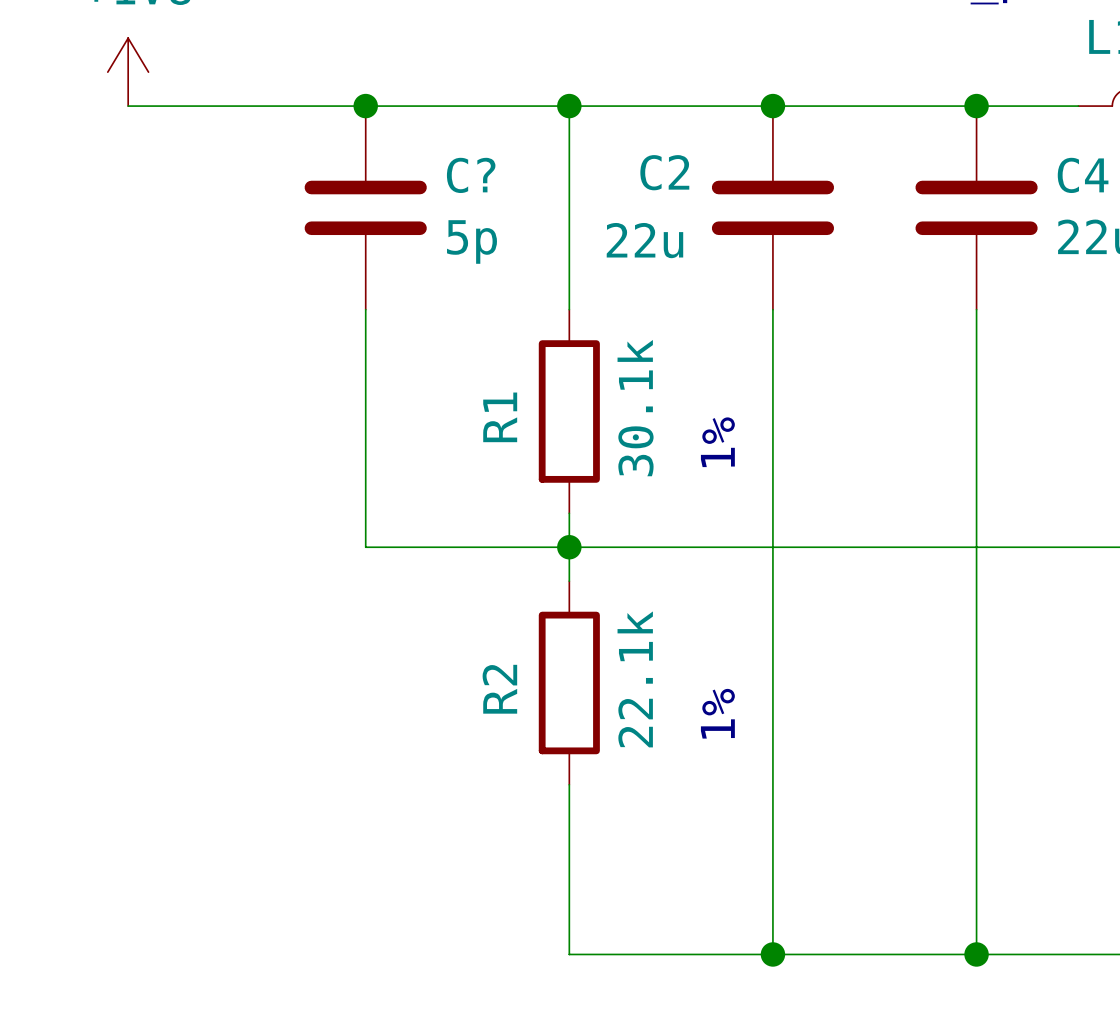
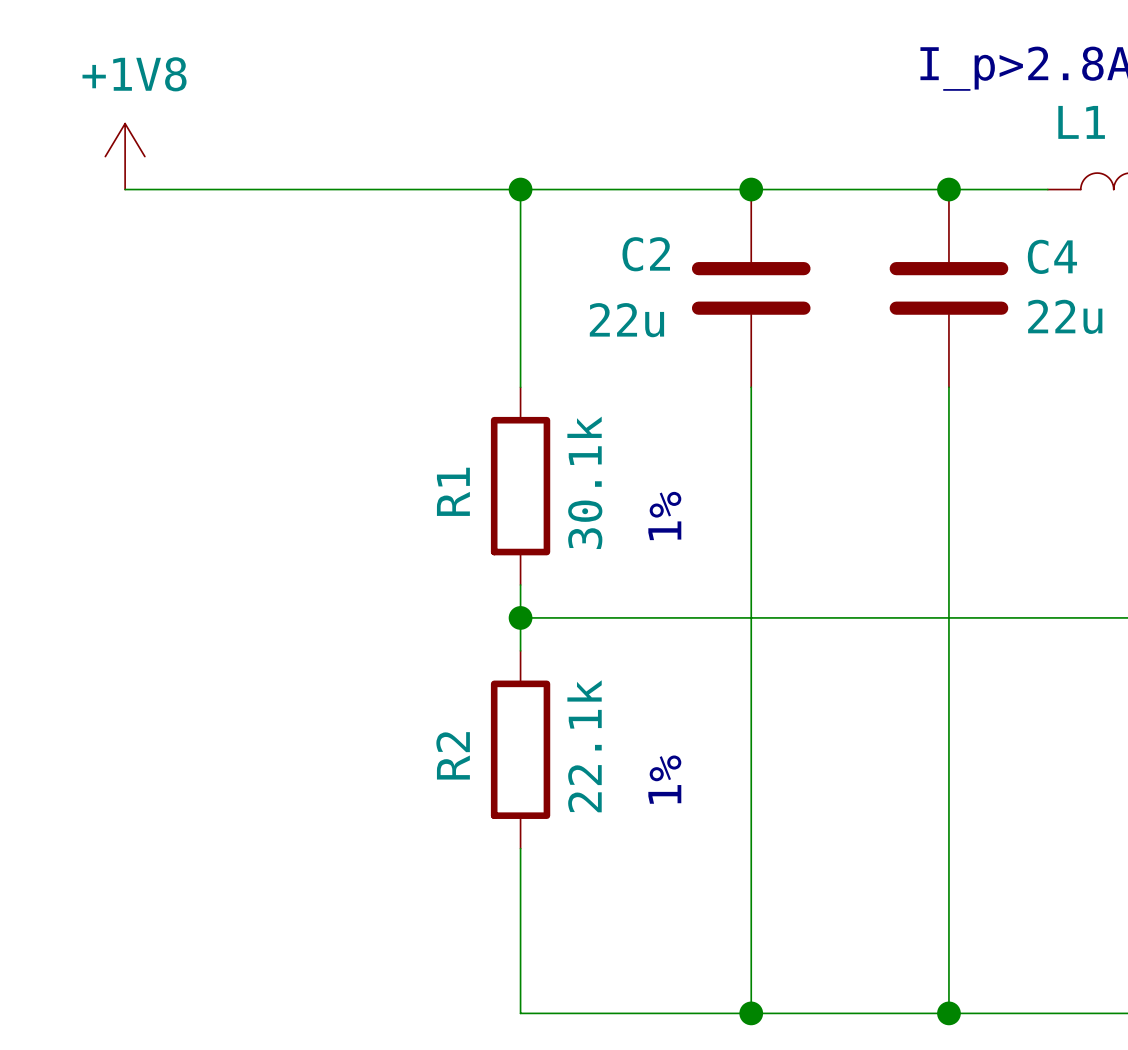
junction: (365, 106) -> none
wire: (569, 106) (569, 309) -> (520, 189) (520, 387)
junction position: (569, 106) -> (520, 189)
C?: 5p (365, 207) -> none
wire: (365, 309) (365, 547) (535, 547) -> none
R1 position: (569, 411) -> (520, 486)
text position: 1% (717, 442) -> 1% (664, 515)
wire: (569, 513) (569, 581) -> (520, 584) (520, 650)
junction position: (569, 547) -> (520, 617)
R2 position: (569, 682) -> (520, 749)
text position: 1% (717, 713) -> 1% (664, 779)
wire: (569, 784) (569, 954) -> (520, 848) (520, 1013) (553, 1013)

